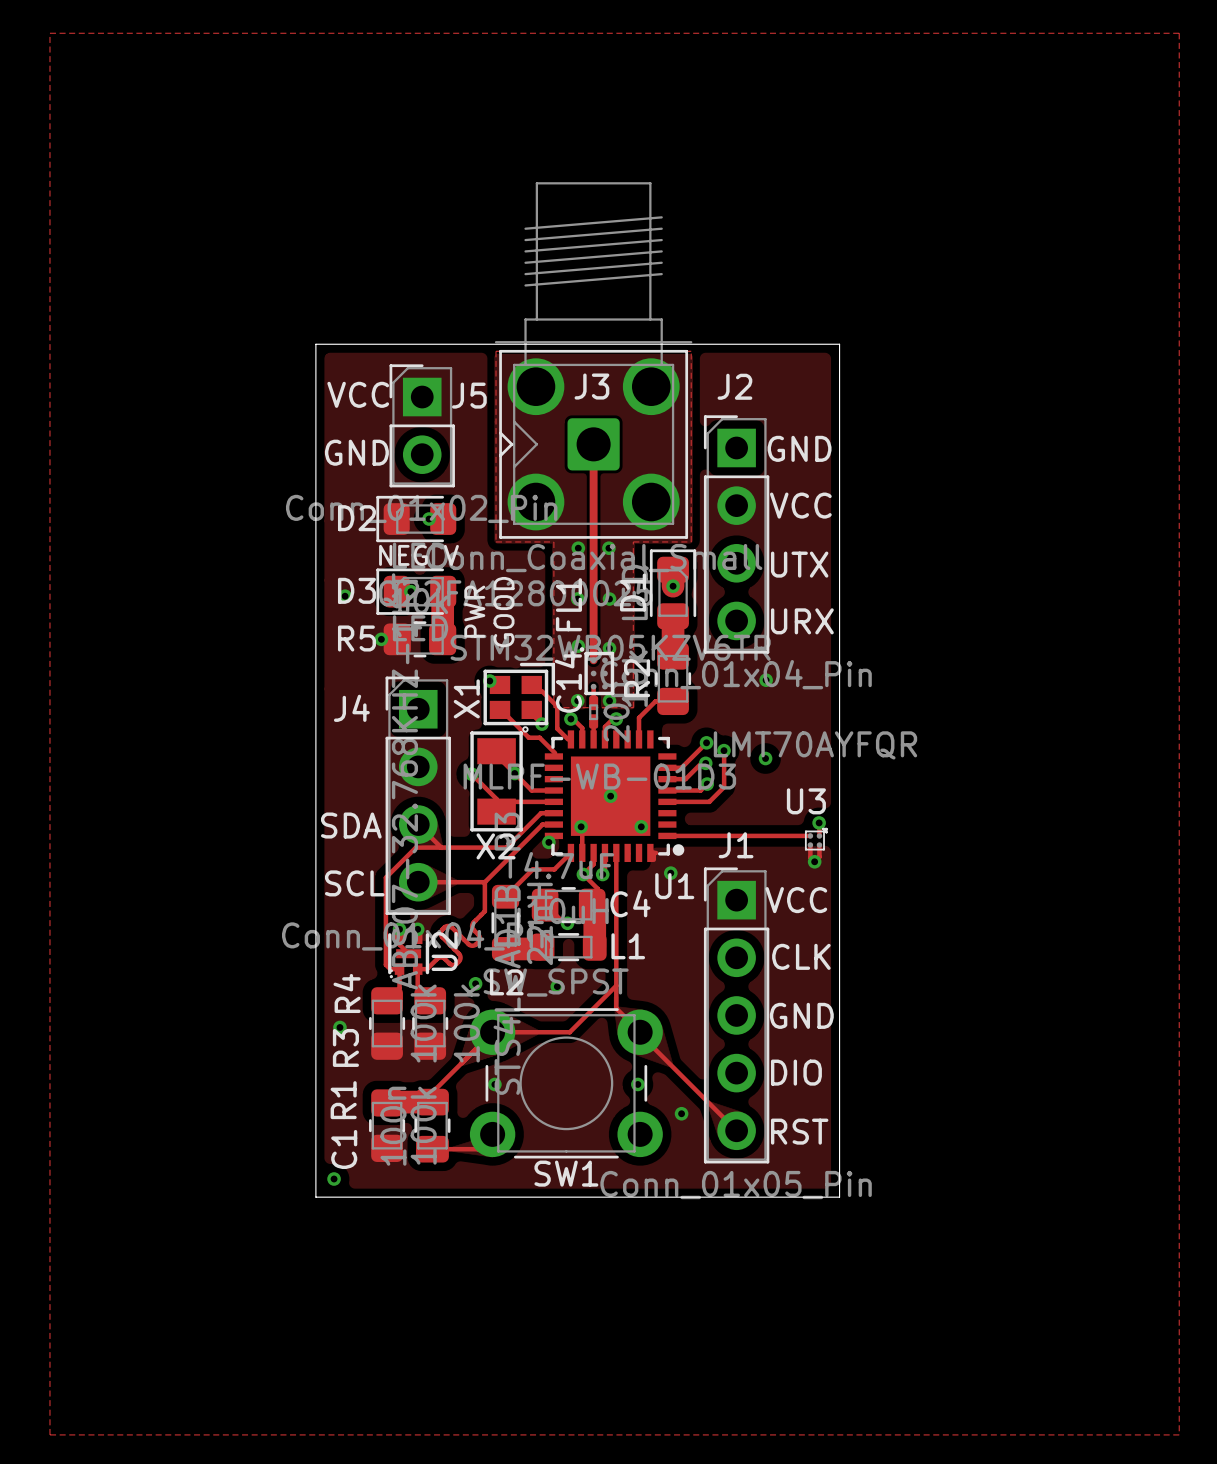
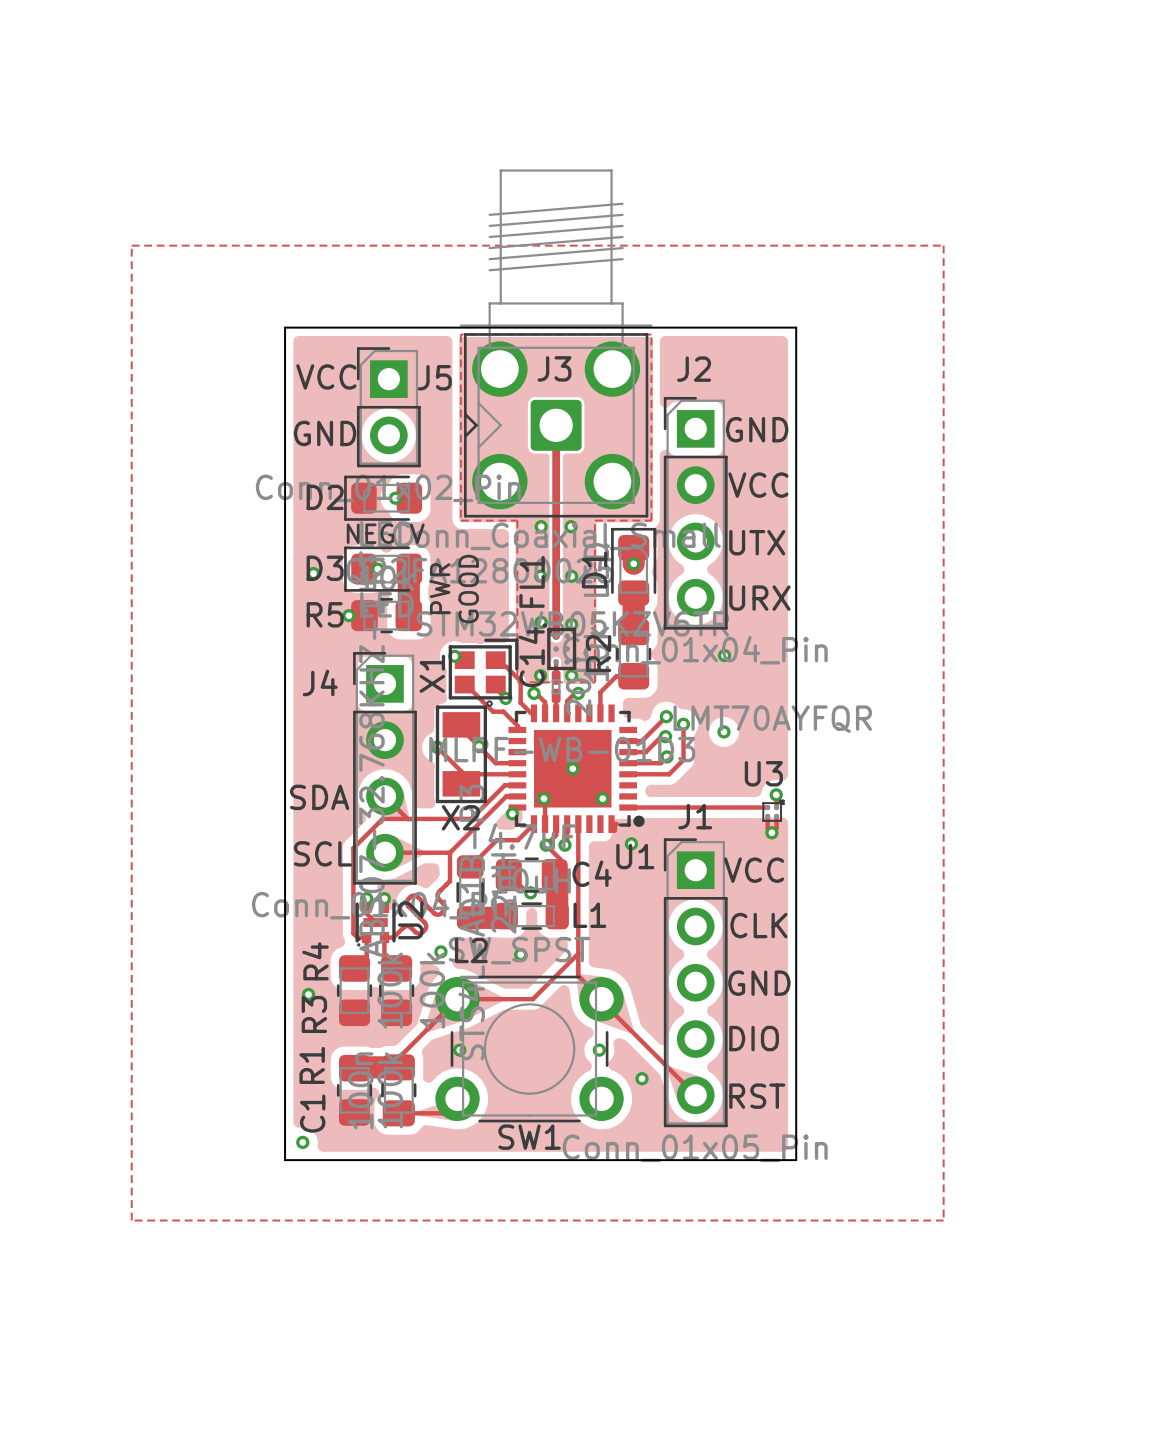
zone outline: (49, 33) (1179, 33) (1179, 1434) (49, 1434) (49, 33) -> (131, 245) (131, 1220) (943, 1220) (943, 245) (131, 245)

